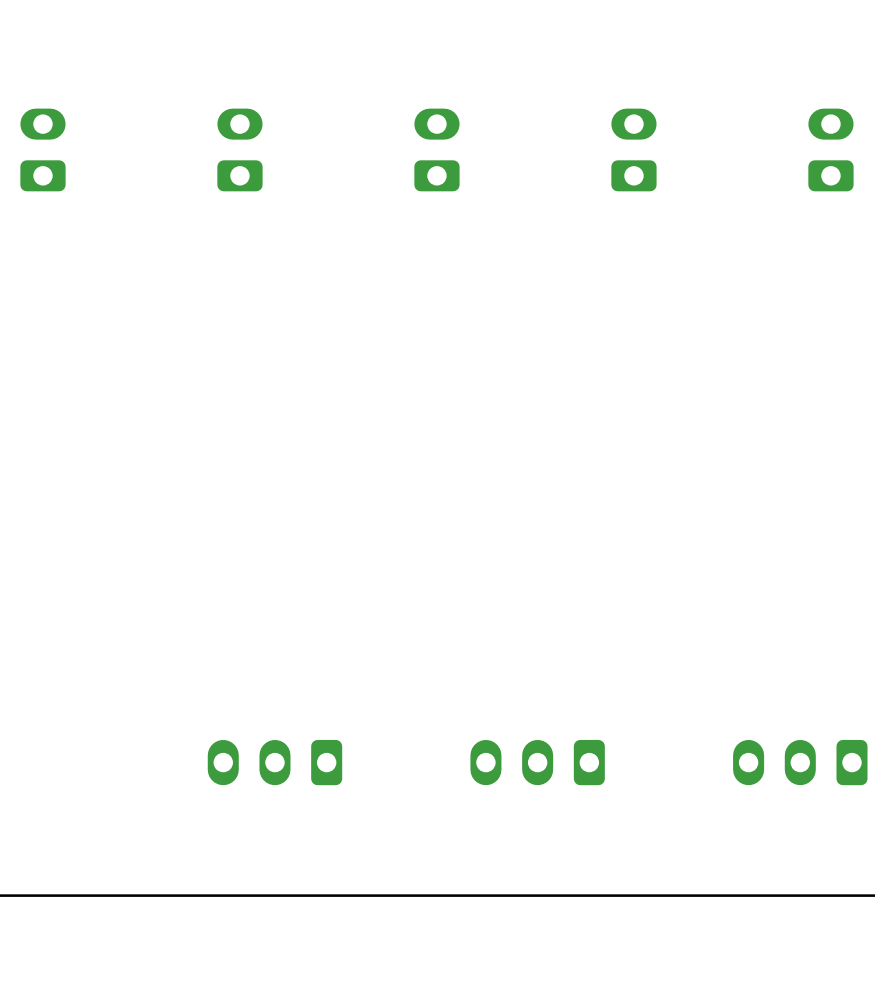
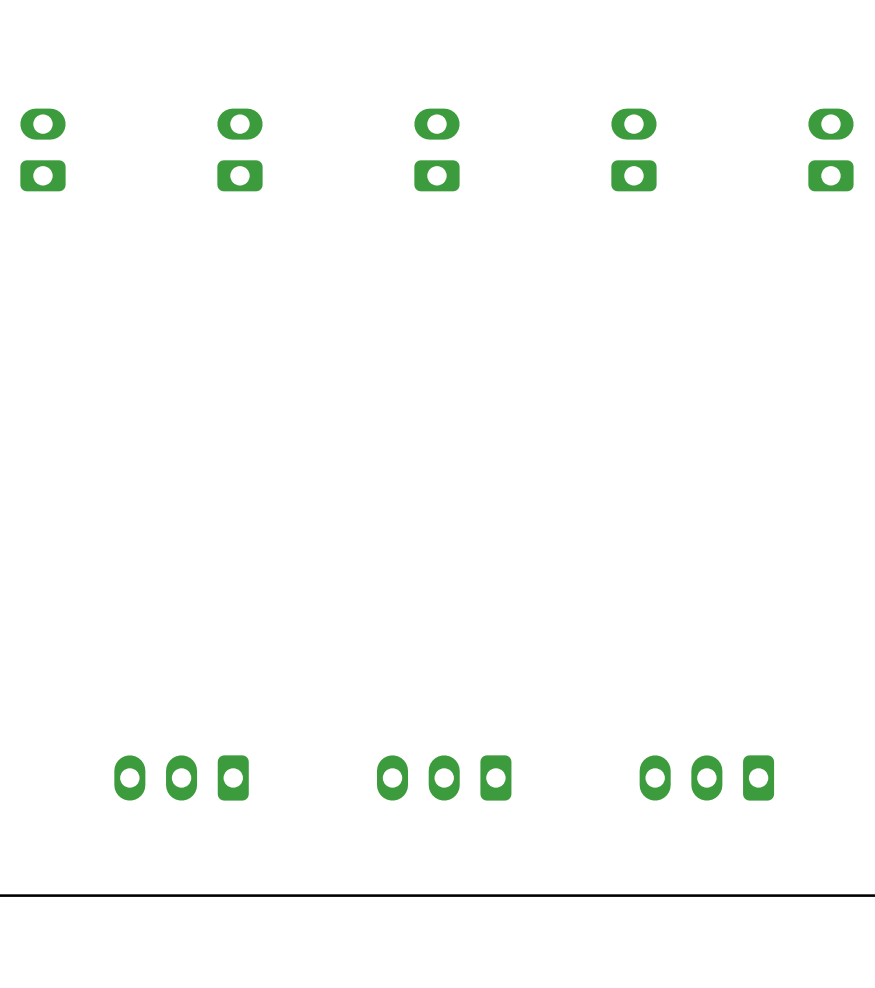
part: (274, 762) -> none
part: (537, 762) -> none
part: (800, 762) -> none
part: none -> (181, 777)
part: none -> (444, 777)
part: none -> (706, 777)

